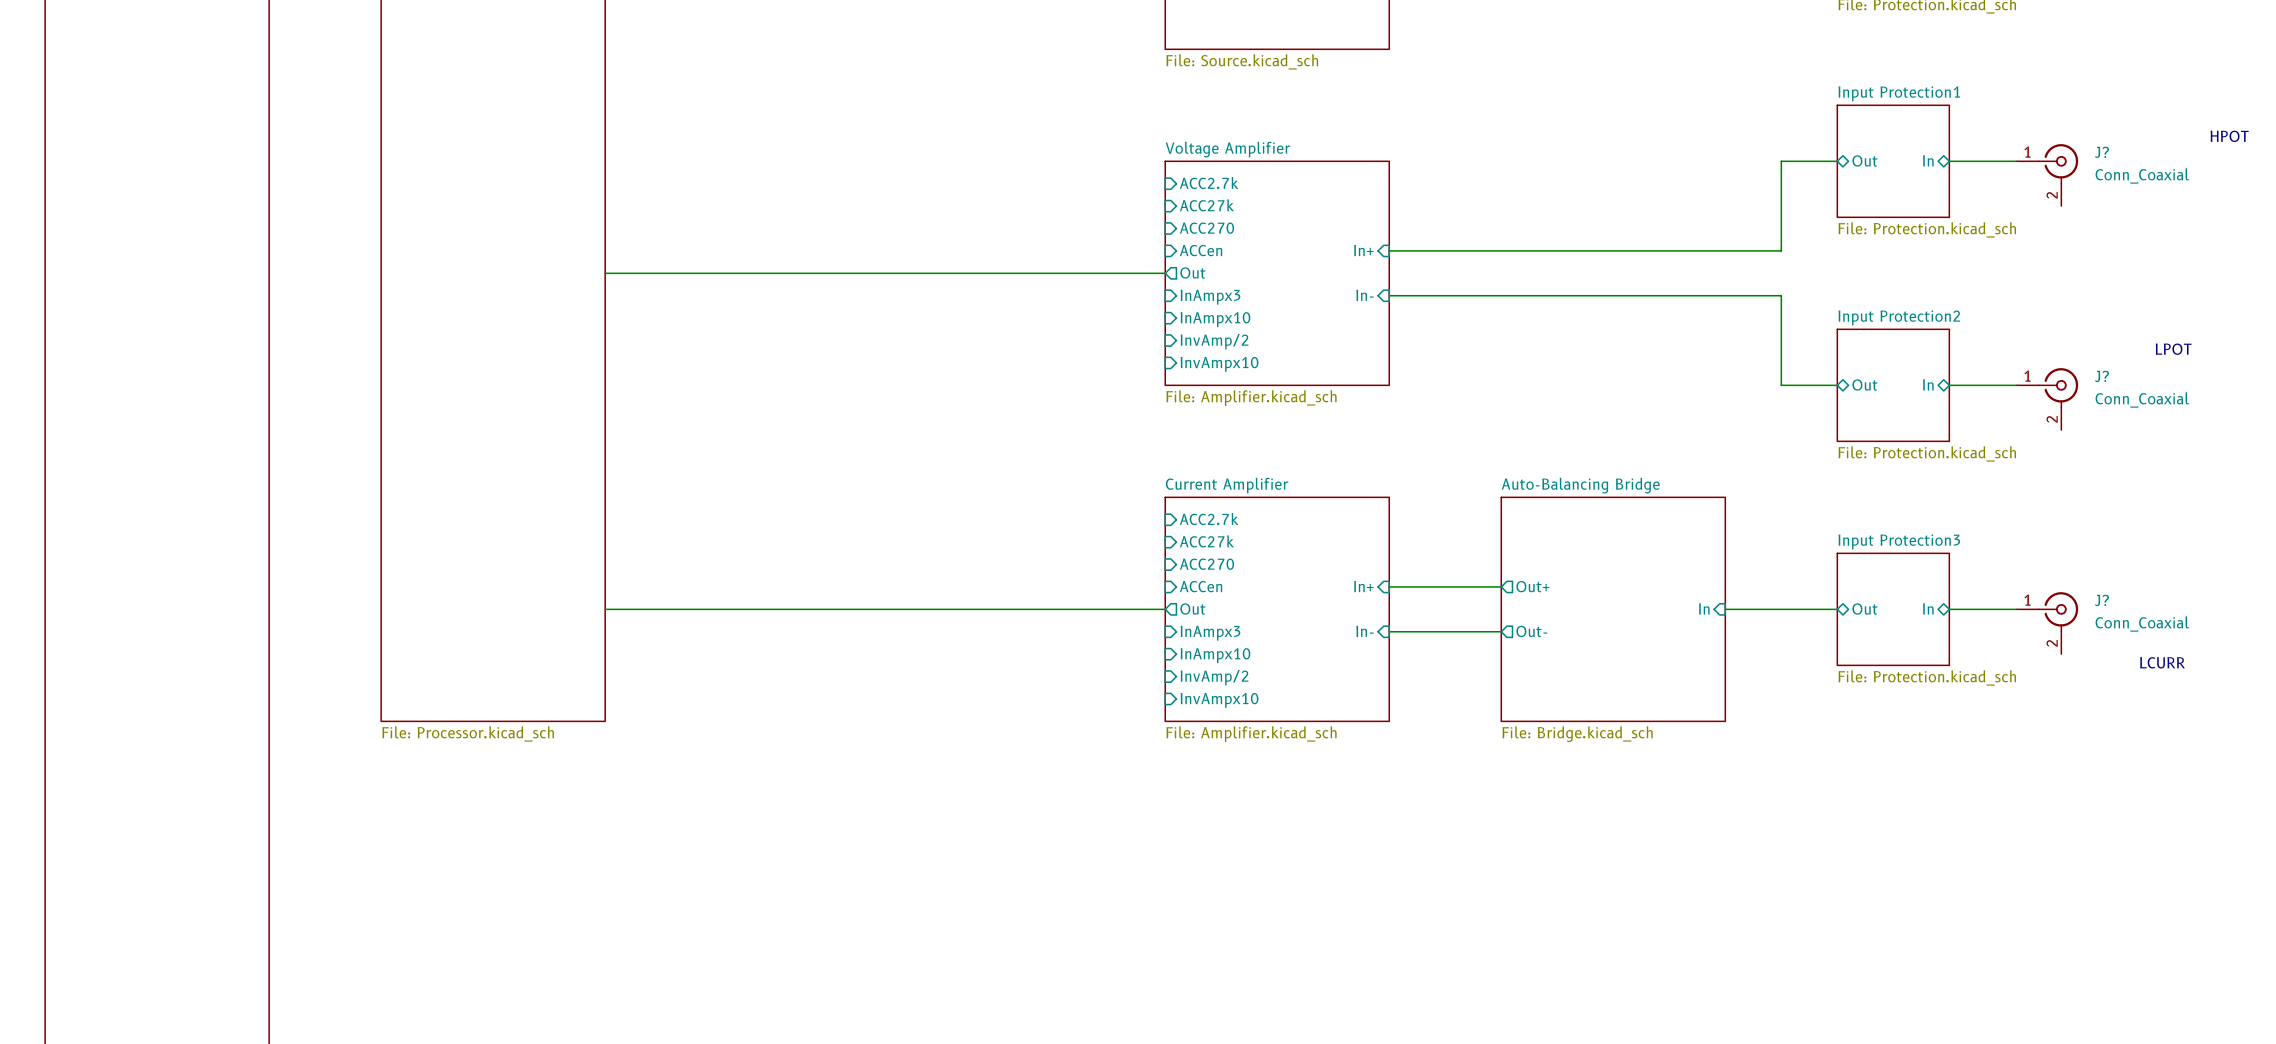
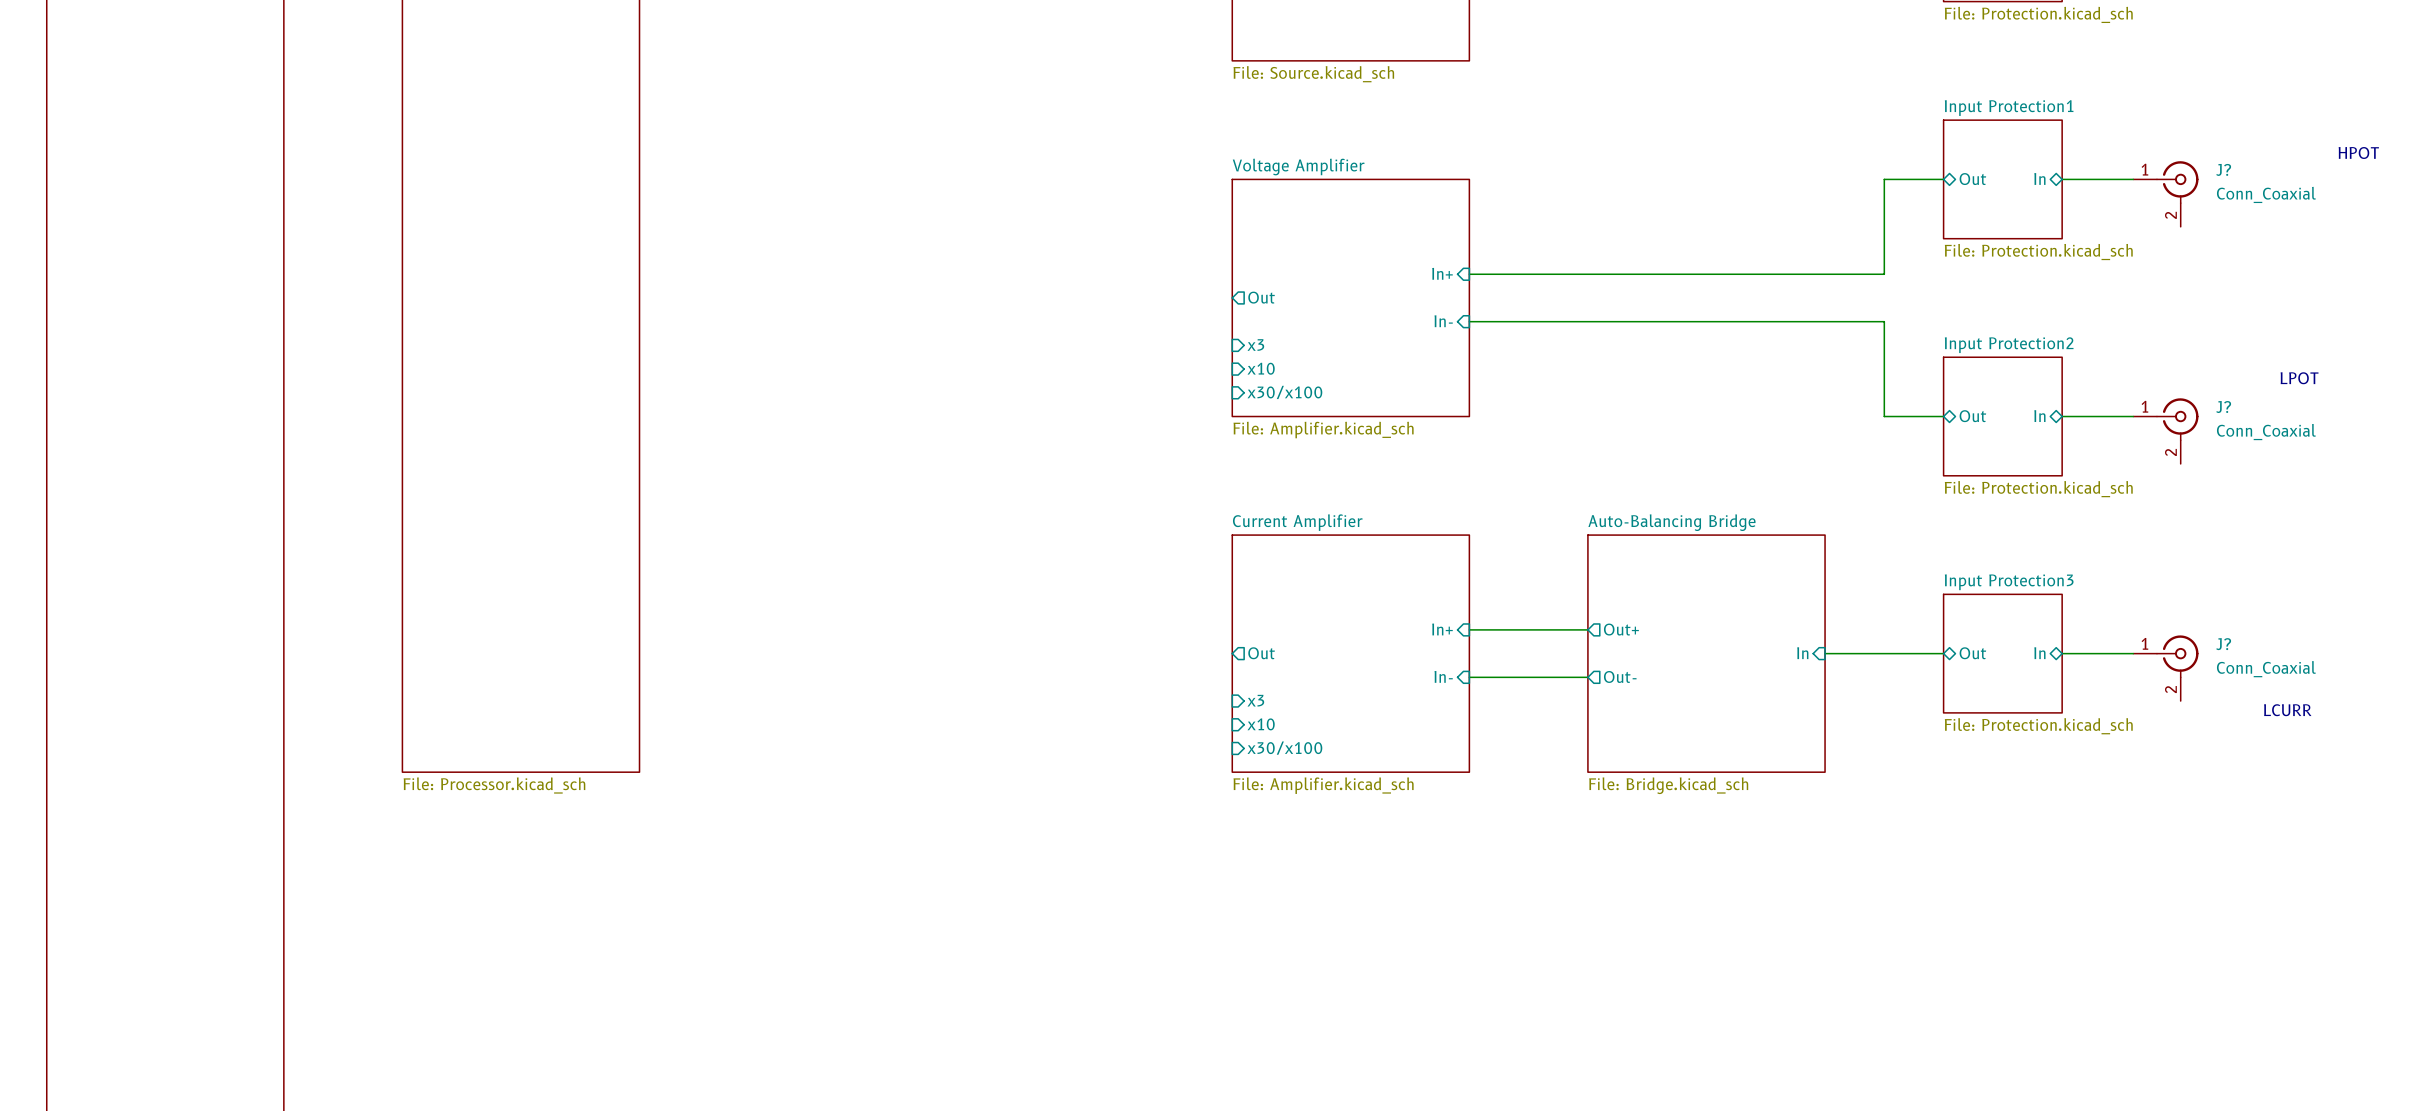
sheet pin: ACC2.7k (1209, 182) -> none
sheet pin: ACC27k (1206, 205) -> none
sheet pin: ACC270 (1207, 228) -> none
sheet pin: ACCen (1201, 250) -> none
wire: (605, 273) (1165, 273) -> none
sheet pin: InAmpx3 (1210, 297) -> none
sheet pin: InAmpx10 (1215, 319) -> x3 (1255, 345)
sheet pin: InvAmp/2 (1214, 341) -> x10 (1261, 368)
sheet pin: InvAmpx10 (1219, 364) -> x30/x100 (1284, 392)
sheet pin: ACC2.7k (1209, 519) -> none
sheet pin: ACC27k (1206, 541) -> none
sheet pin: ACC270 (1207, 564) -> none
sheet pin: ACCen (1201, 586) -> none
wire: (605, 609) (1165, 609) -> none
sheet pin: InAmpx3 (1210, 633) -> none
sheet pin: InAmpx10 (1215, 655) -> x3 (1255, 700)
sheet pin: InvAmp/2 (1214, 677) -> x10 (1261, 724)
sheet pin: InvAmpx10 (1219, 700) -> x30/x100 (1284, 748)

